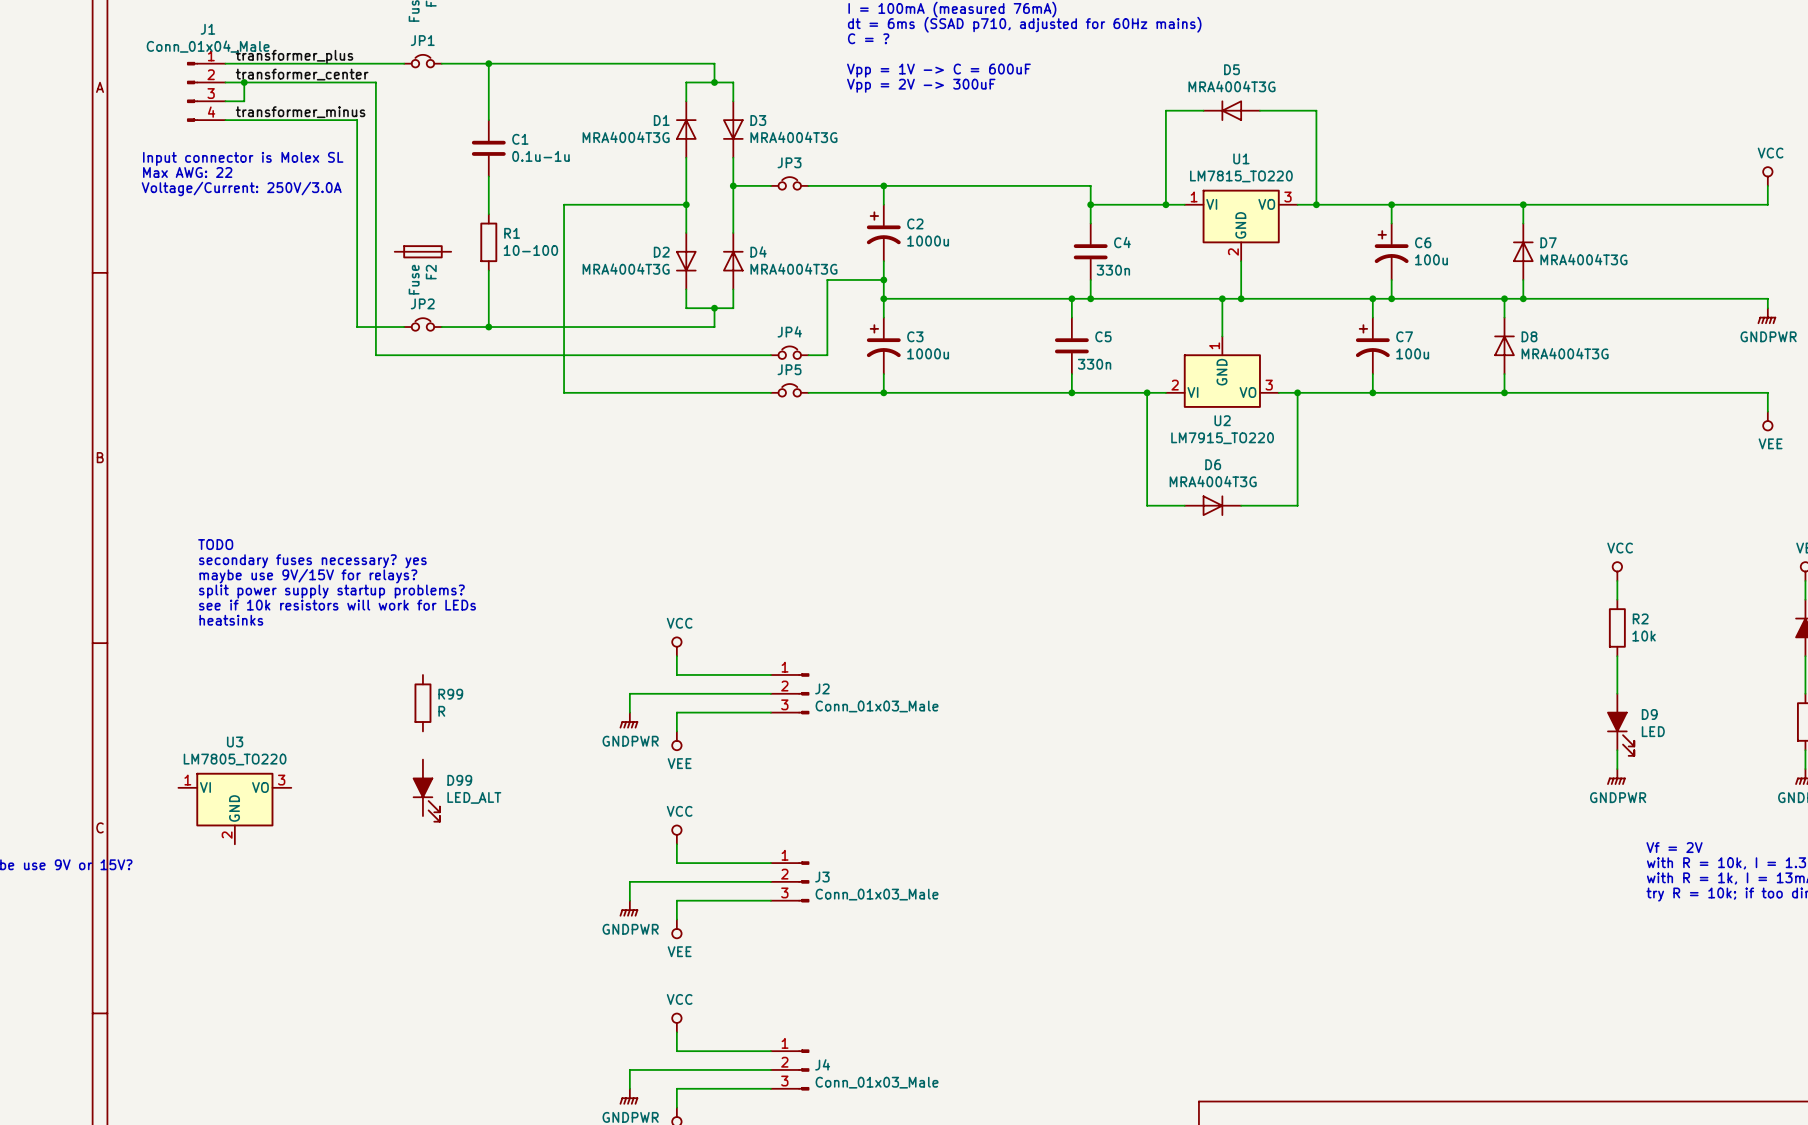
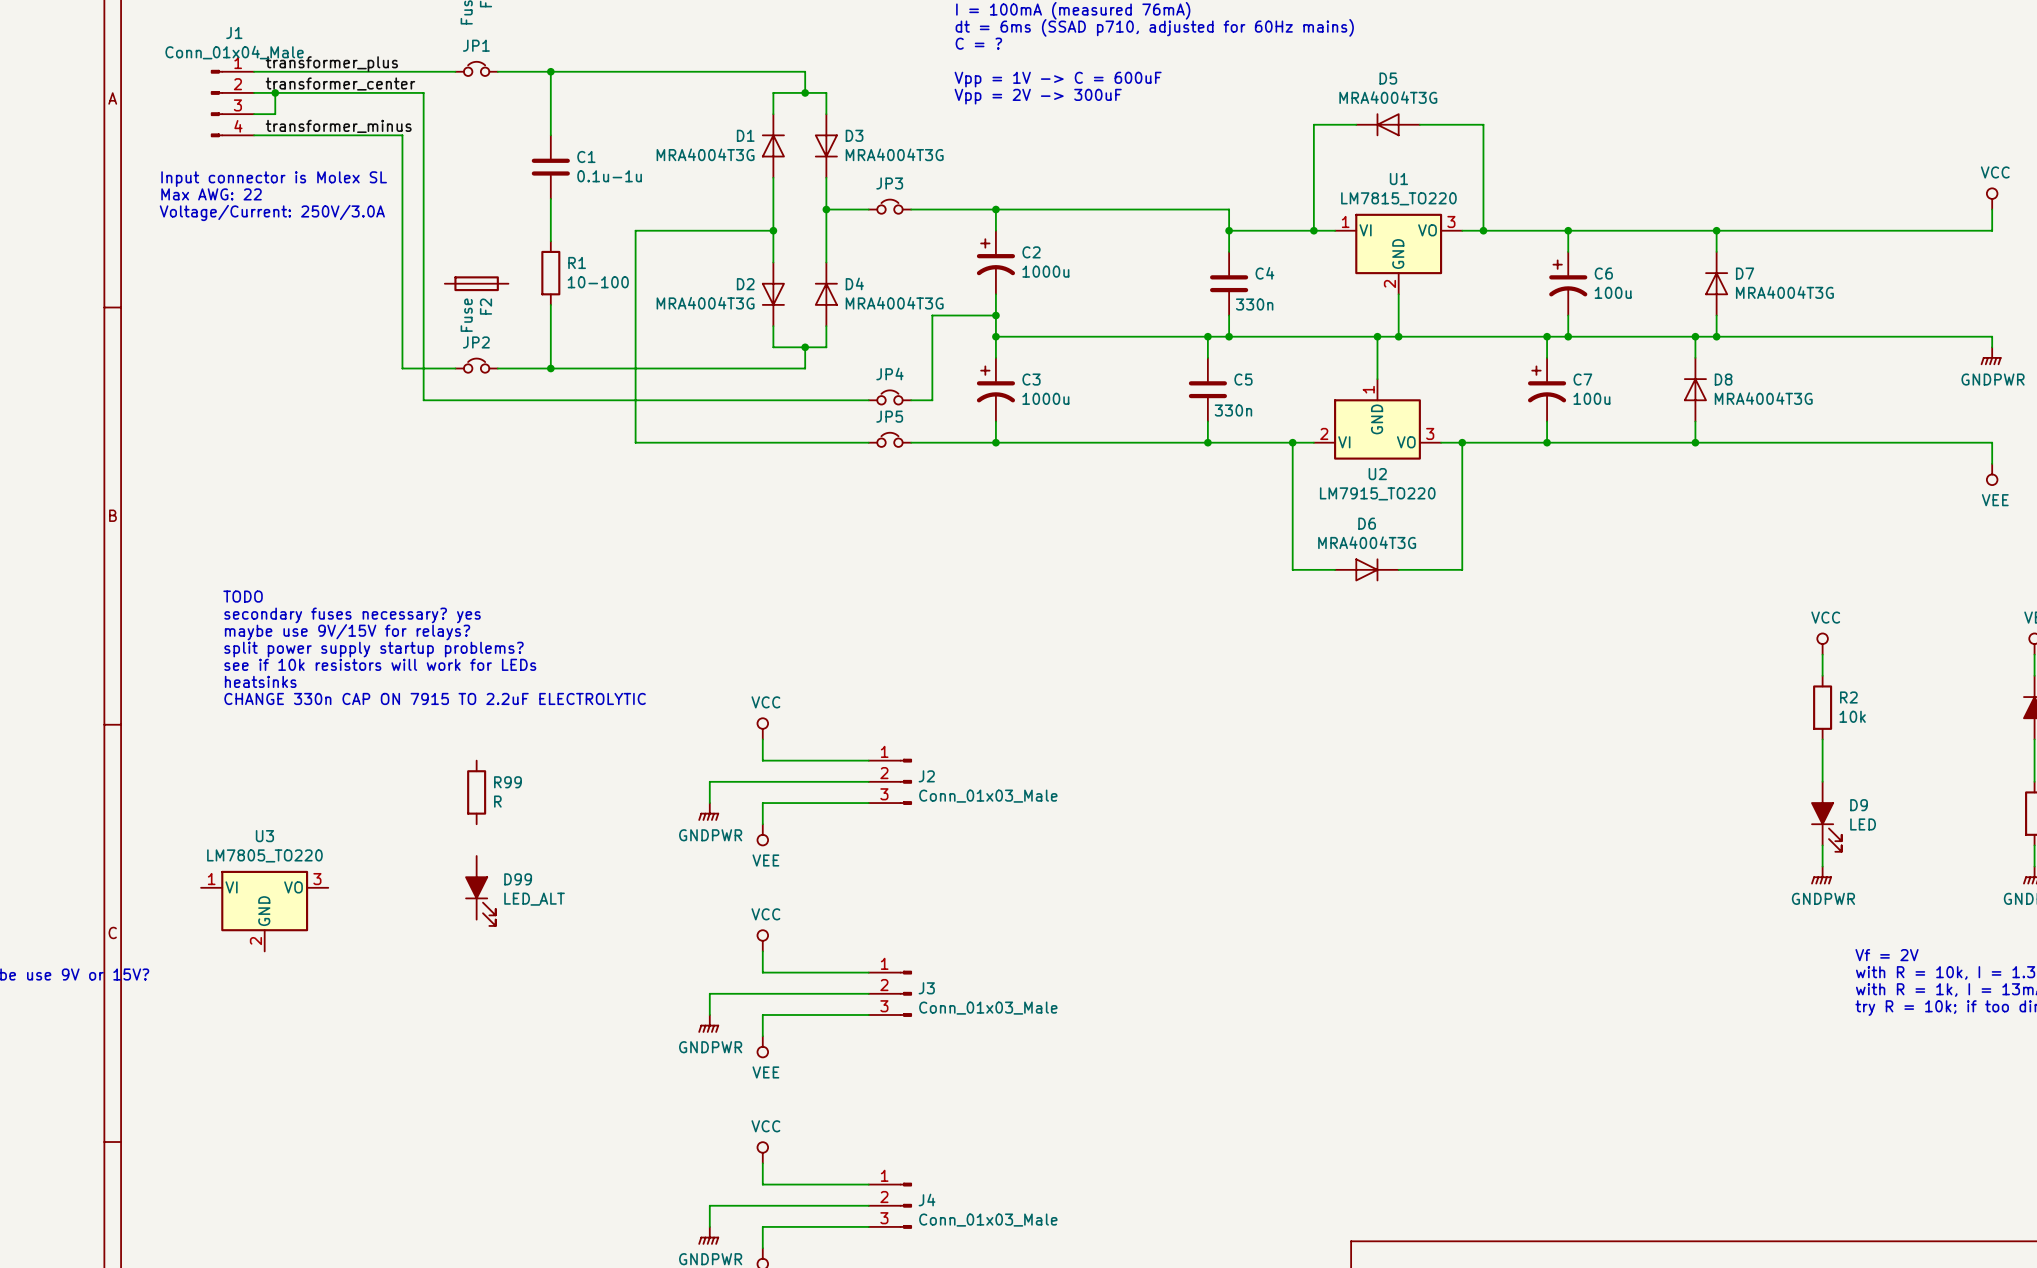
text: none -> TODO (243, 596)
text: TODO (215, 544) -> secondary fuses necessary? yes (352, 615)
text: secondary fuses necessary? yes (312, 561) -> maybe use 9V/15V for relays? (347, 632)
text: maybe use 9V/15V for relays? (308, 576) -> split power supply startup problems? (374, 649)
text: split power supply startup problems? (331, 591) -> see if 10k resistors will work for LEDs (380, 664)
text: see if 10k resistors will work for LEDs (337, 605) -> heatsinks (260, 681)
text: heatsinks (231, 620) -> CHANGE 330n CAP ON 7915 TO 2.2uF ELECTROLYTIC (435, 698)

